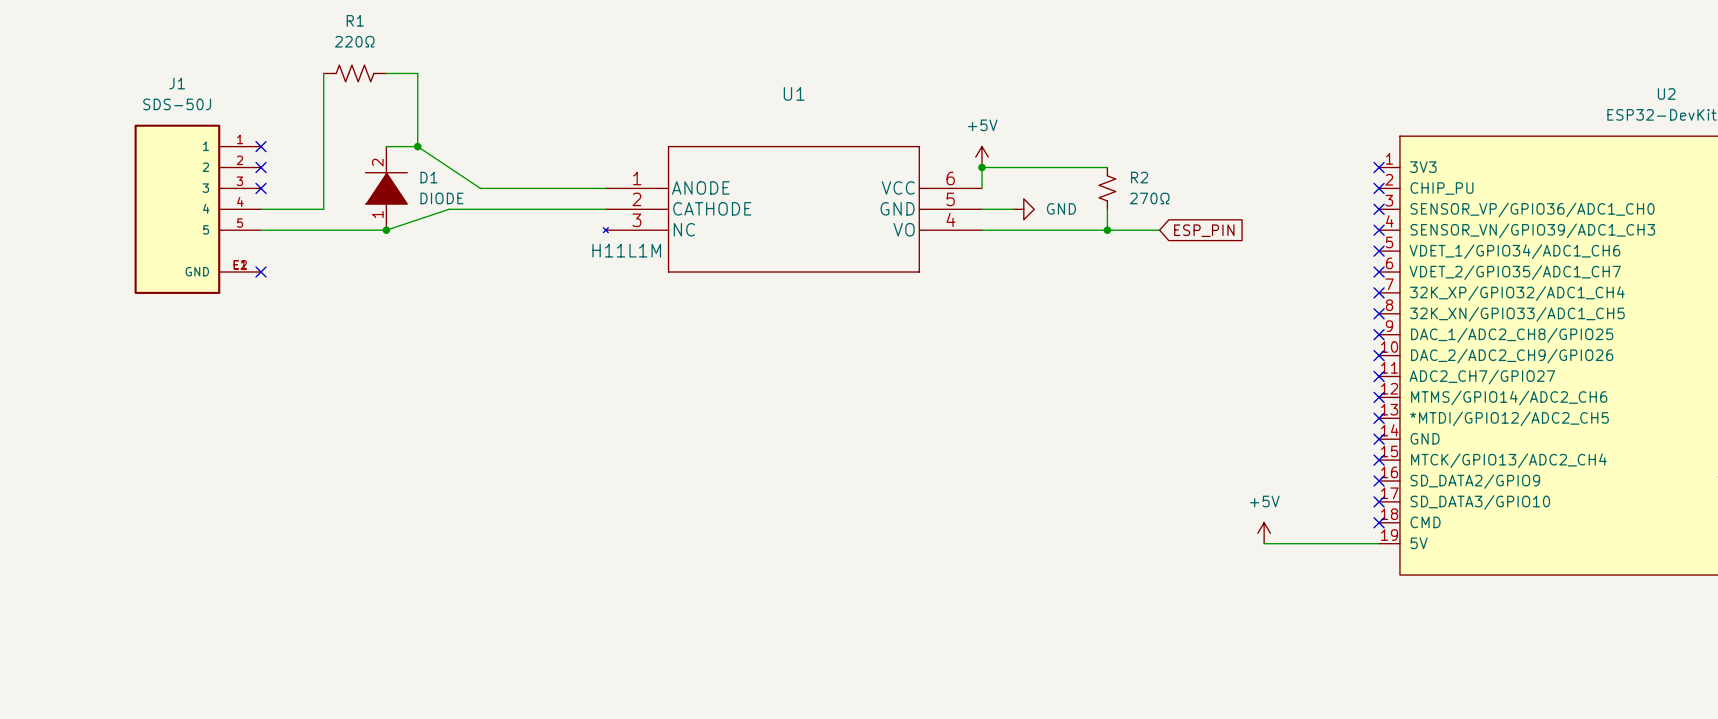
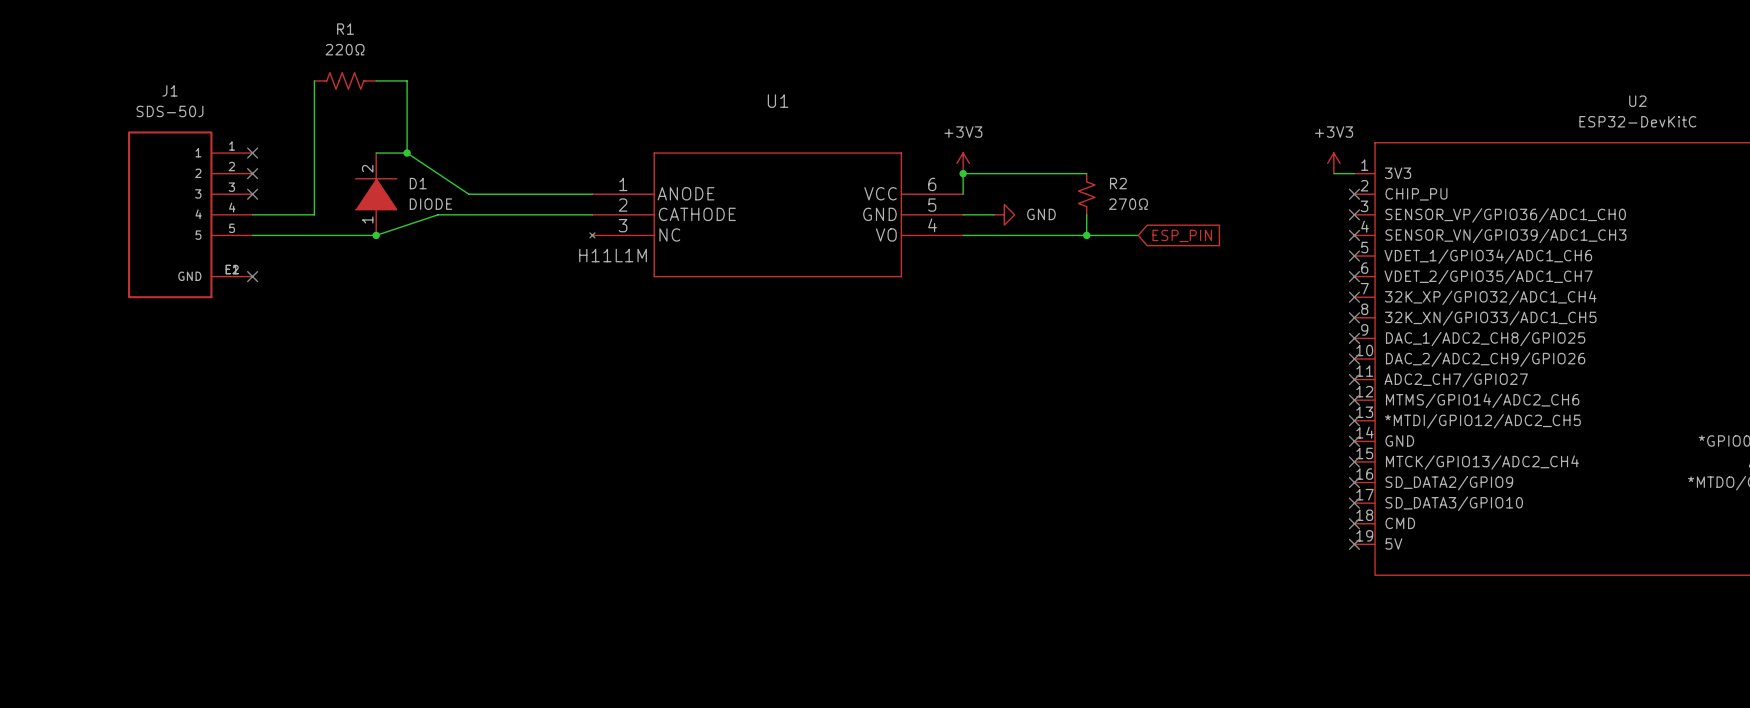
power symbol: +5V (982, 157) -> +3V3 (963, 163)
power symbol: none -> +3V3 (1333, 163)
wire: none -> (1333, 173) (1354, 173)
no-connect mark: (1379, 167) -> none
power symbol: +5V (1264, 533) -> none
wire: (1264, 543) (1379, 543) -> none
no-connect mark: none -> (1354, 544)

